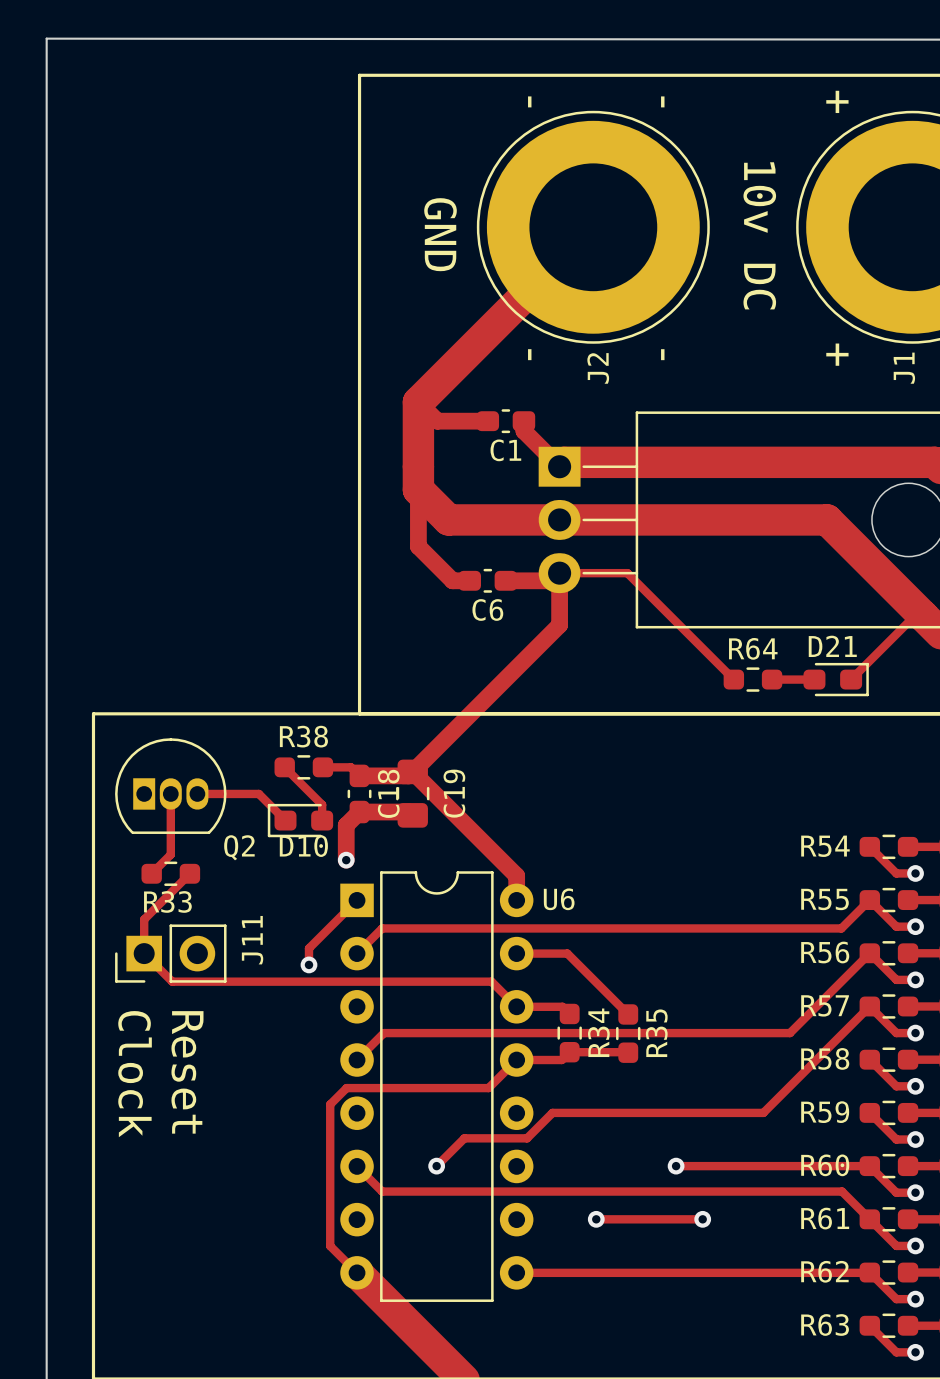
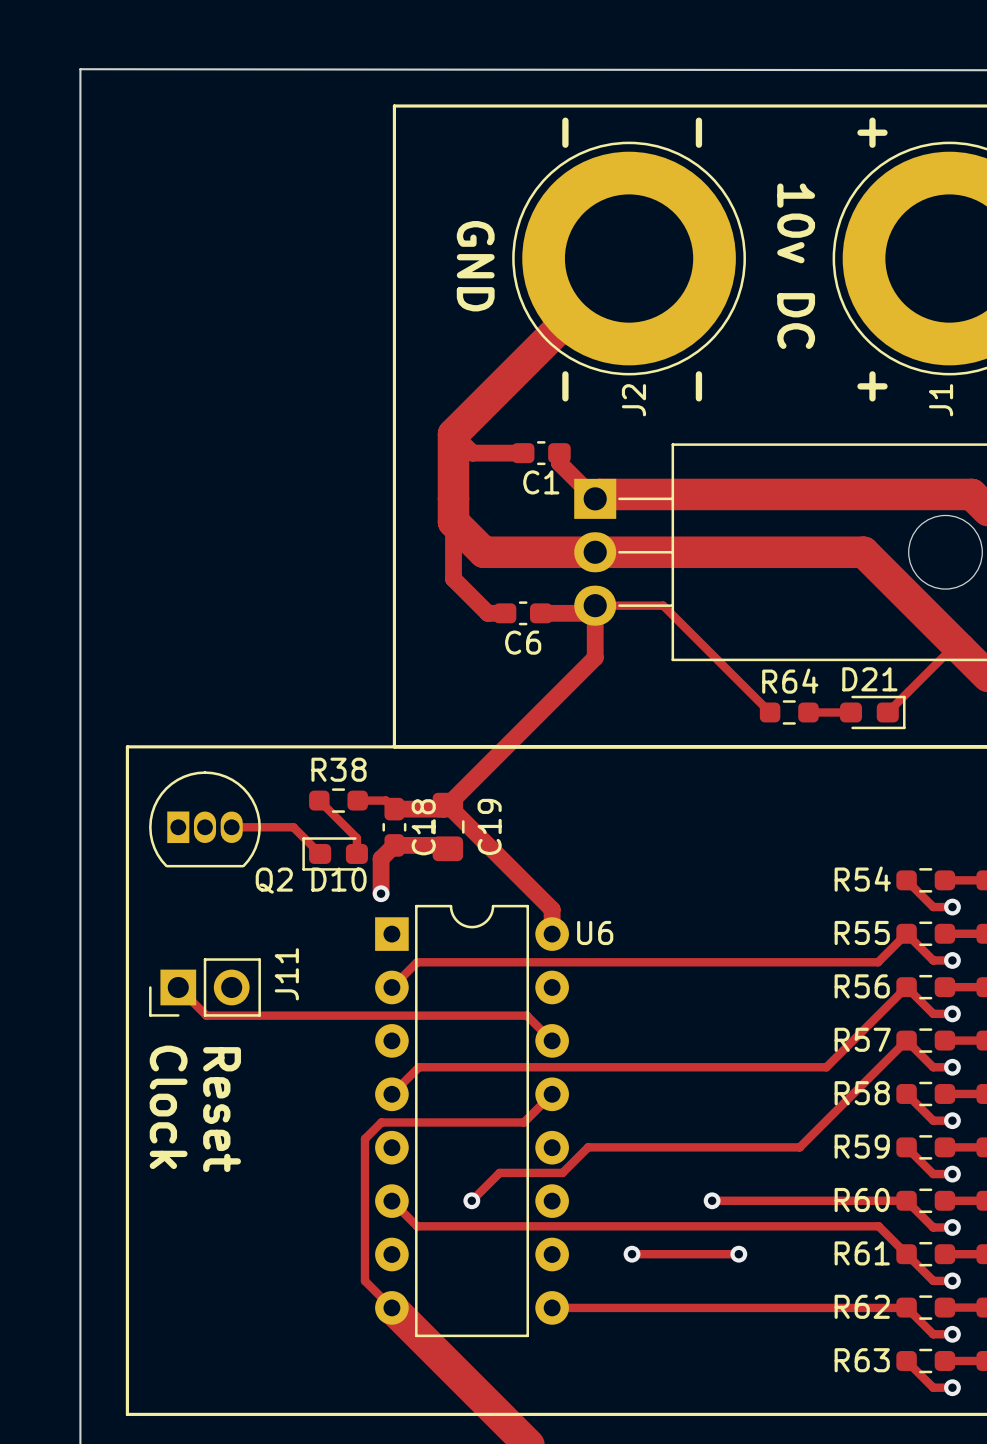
track: (170, 793) (170, 854) (151, 873) -> none
R33: (170, 873) -> none
track: (189, 873) (144, 919) (144, 953) -> none
track: (357, 900) (308, 948) (308, 964) -> none
track: (516, 953) (567, 953) (628, 1014) -> none
via: (308, 964) -> none
track: (516, 1006) (562, 1006) (569, 1013) -> none
R34: (569, 1033) -> none
R35: (628, 1033) -> none
track: (628, 1052) (569, 1052) (561, 1060) (516, 1060) -> none

